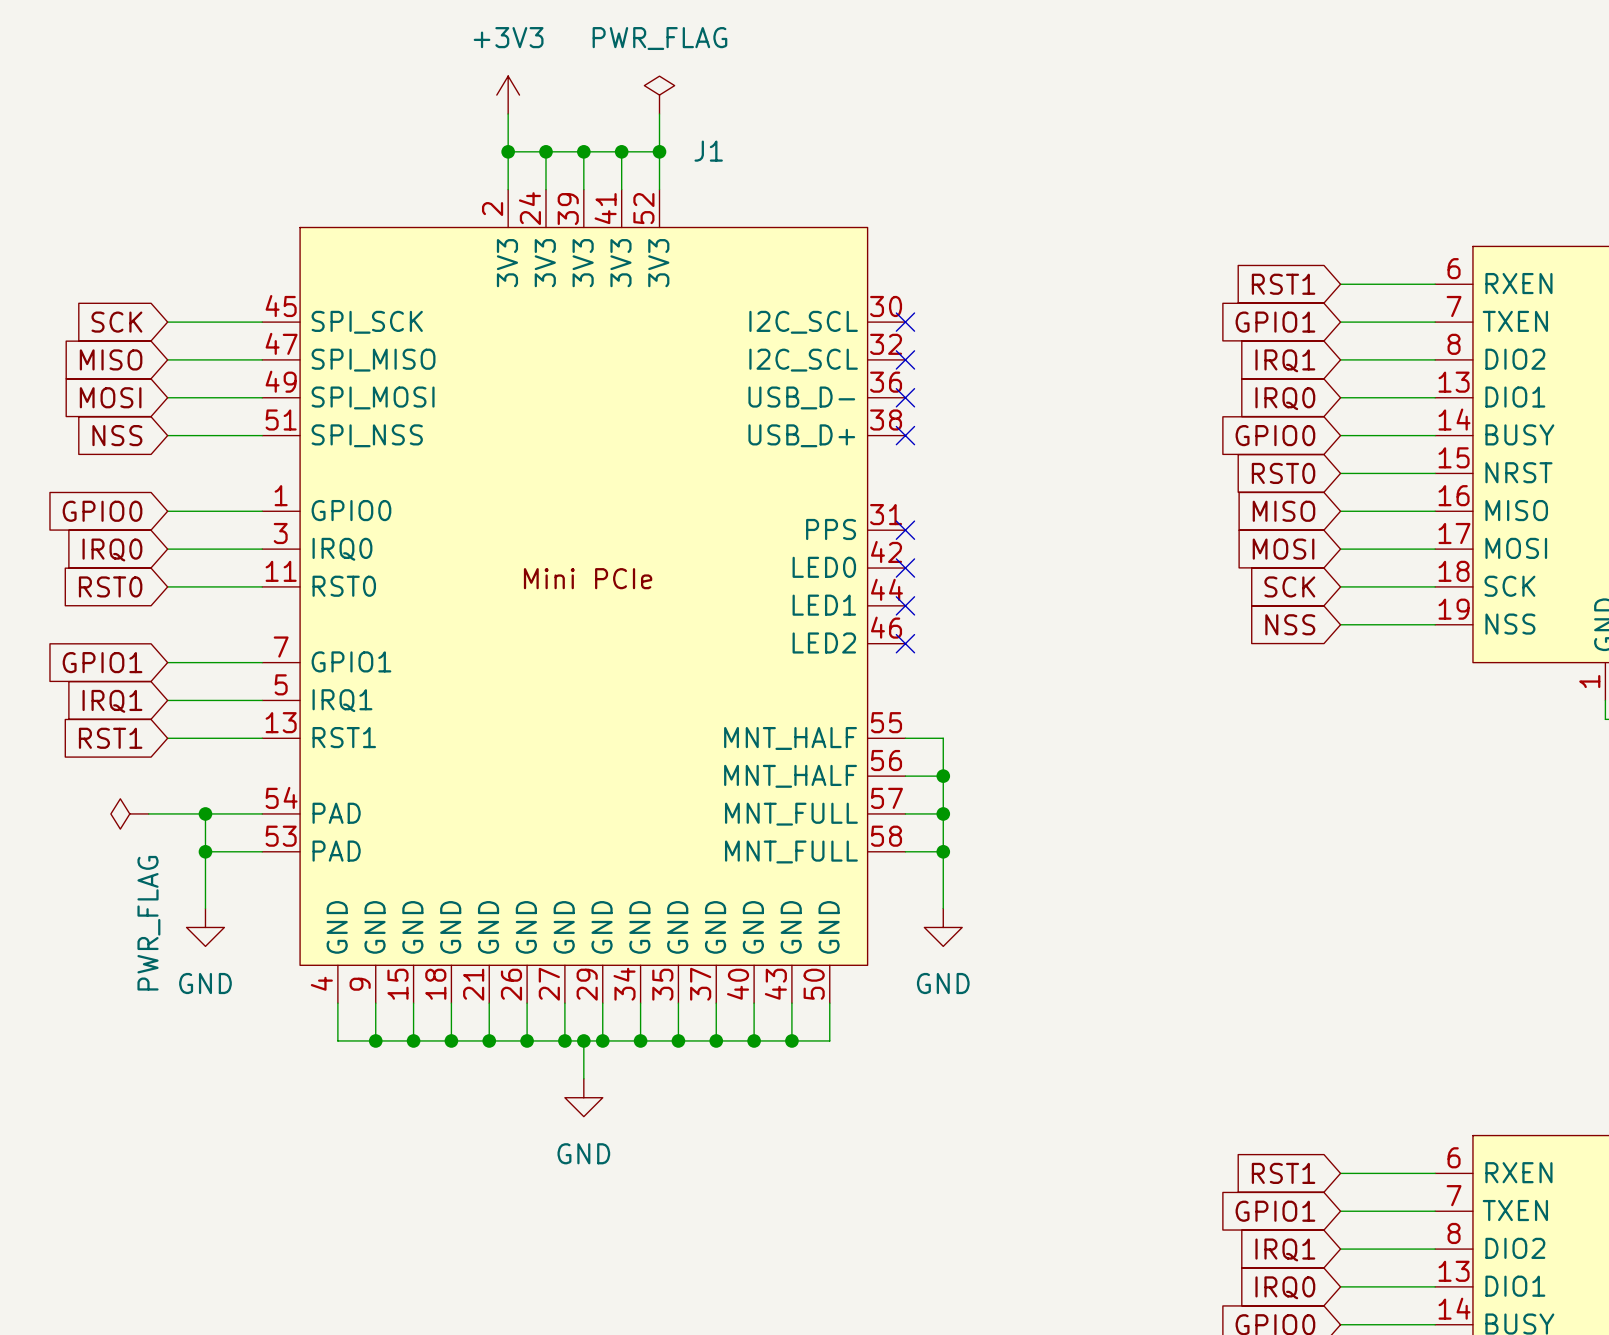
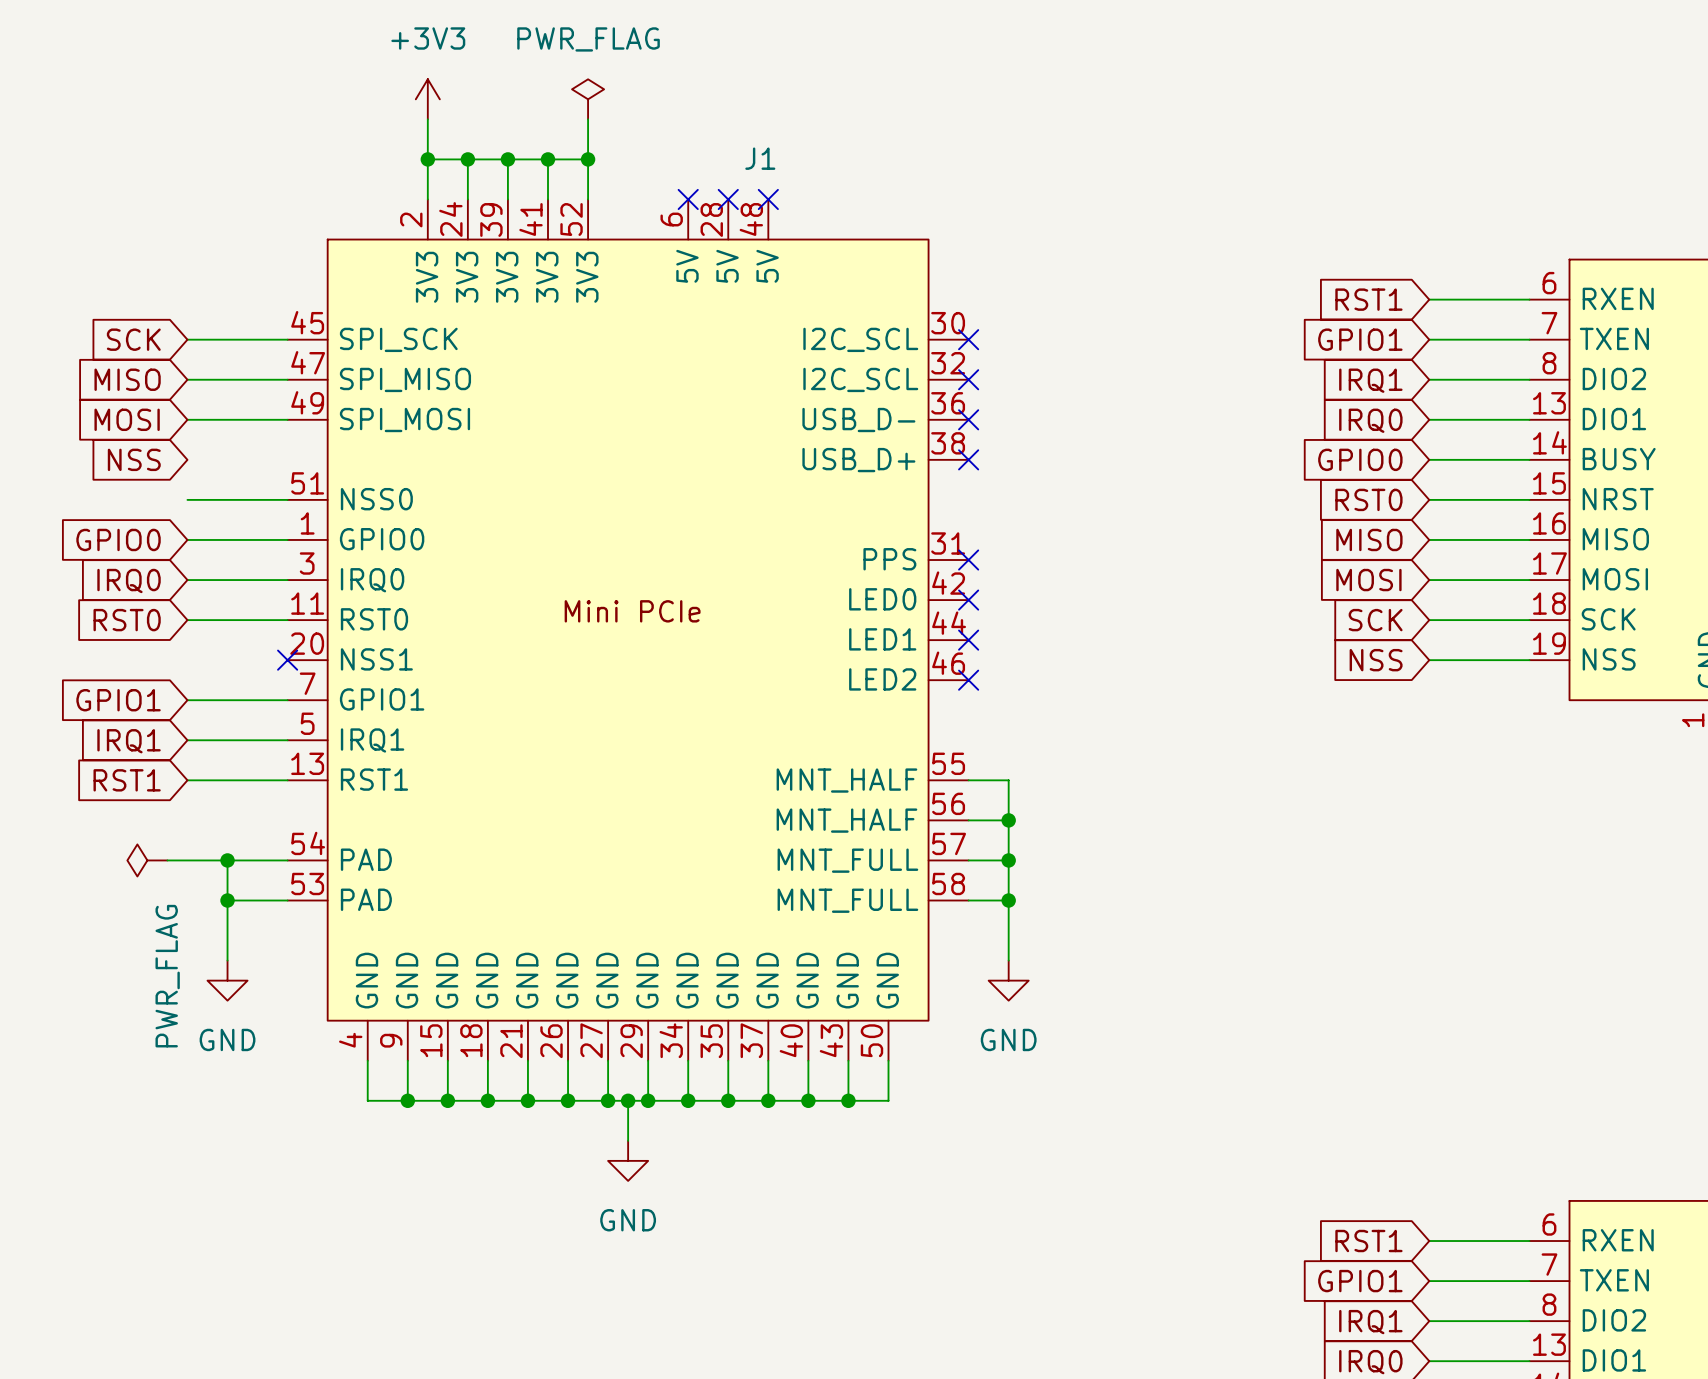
power symbol position: +3V3 (508, 95) -> +3V3 (427, 99)
power symbol position: PWR_FLAG (659, 95) -> PWR_FLAG (588, 99)
wire: (508, 113) (508, 151) -> (427, 159) (548, 159)
wire: (659, 113) (659, 189) -> (427, 119) (427, 199)
junction: none -> (427, 159)
junction: none -> (467, 159)
junction: none -> (507, 159)
wire: (545, 151) (659, 151) -> (588, 159) (588, 119)
wire: (583, 151) (583, 189) -> (467, 159) (467, 199)
junction: (583, 151) -> none
wire: (621, 151) (621, 189) -> (507, 159) (507, 199)
junction: (621, 151) -> none
junction: (659, 151) -> none
J1 symbol: [262, 189, 906, 1004] -> [287, 199, 969, 1061]
no-connect mark: none -> (688, 199)
no-connect mark: none -> (728, 199)
no-connect mark: none -> (768, 199)
wire: (167, 435) (262, 435) -> (187, 499) (287, 499)
no-connect mark: none -> (287, 660)

